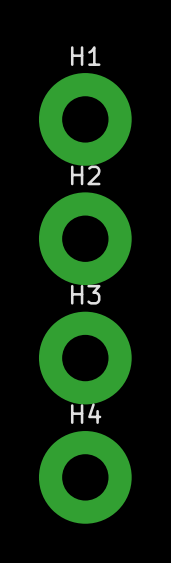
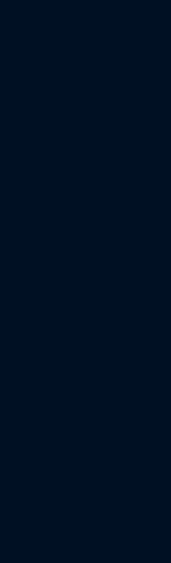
H1: (85, 119) -> none
H2: (85, 238) -> none
H3: (85, 358) -> none
H4: (85, 477) -> none

